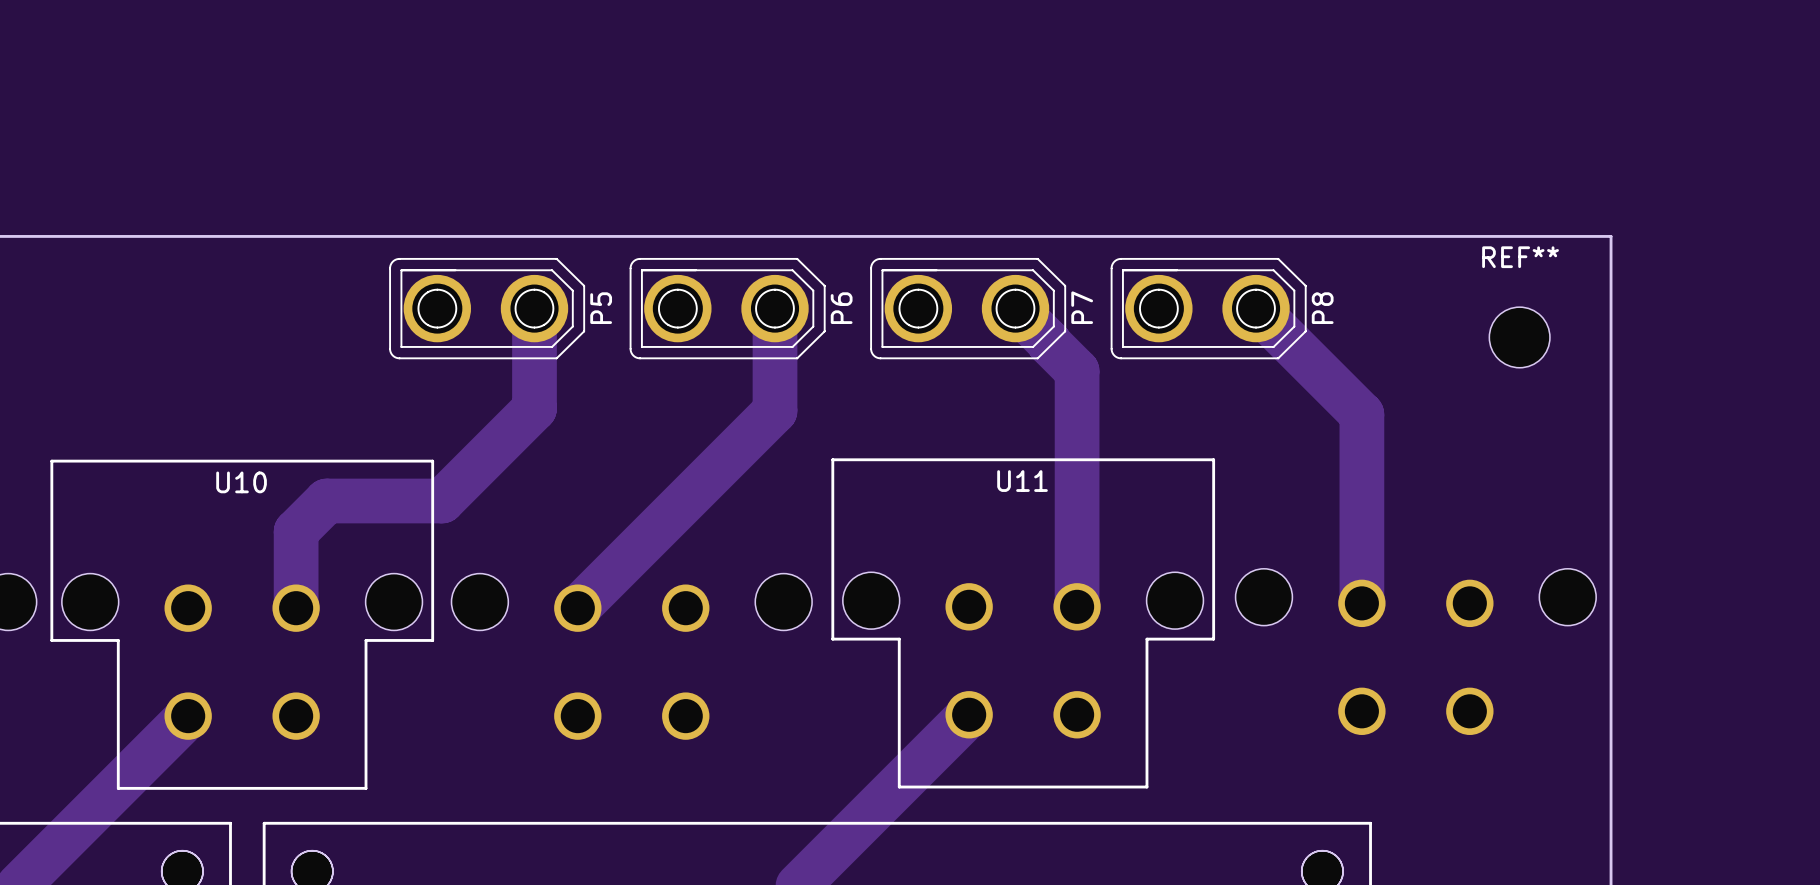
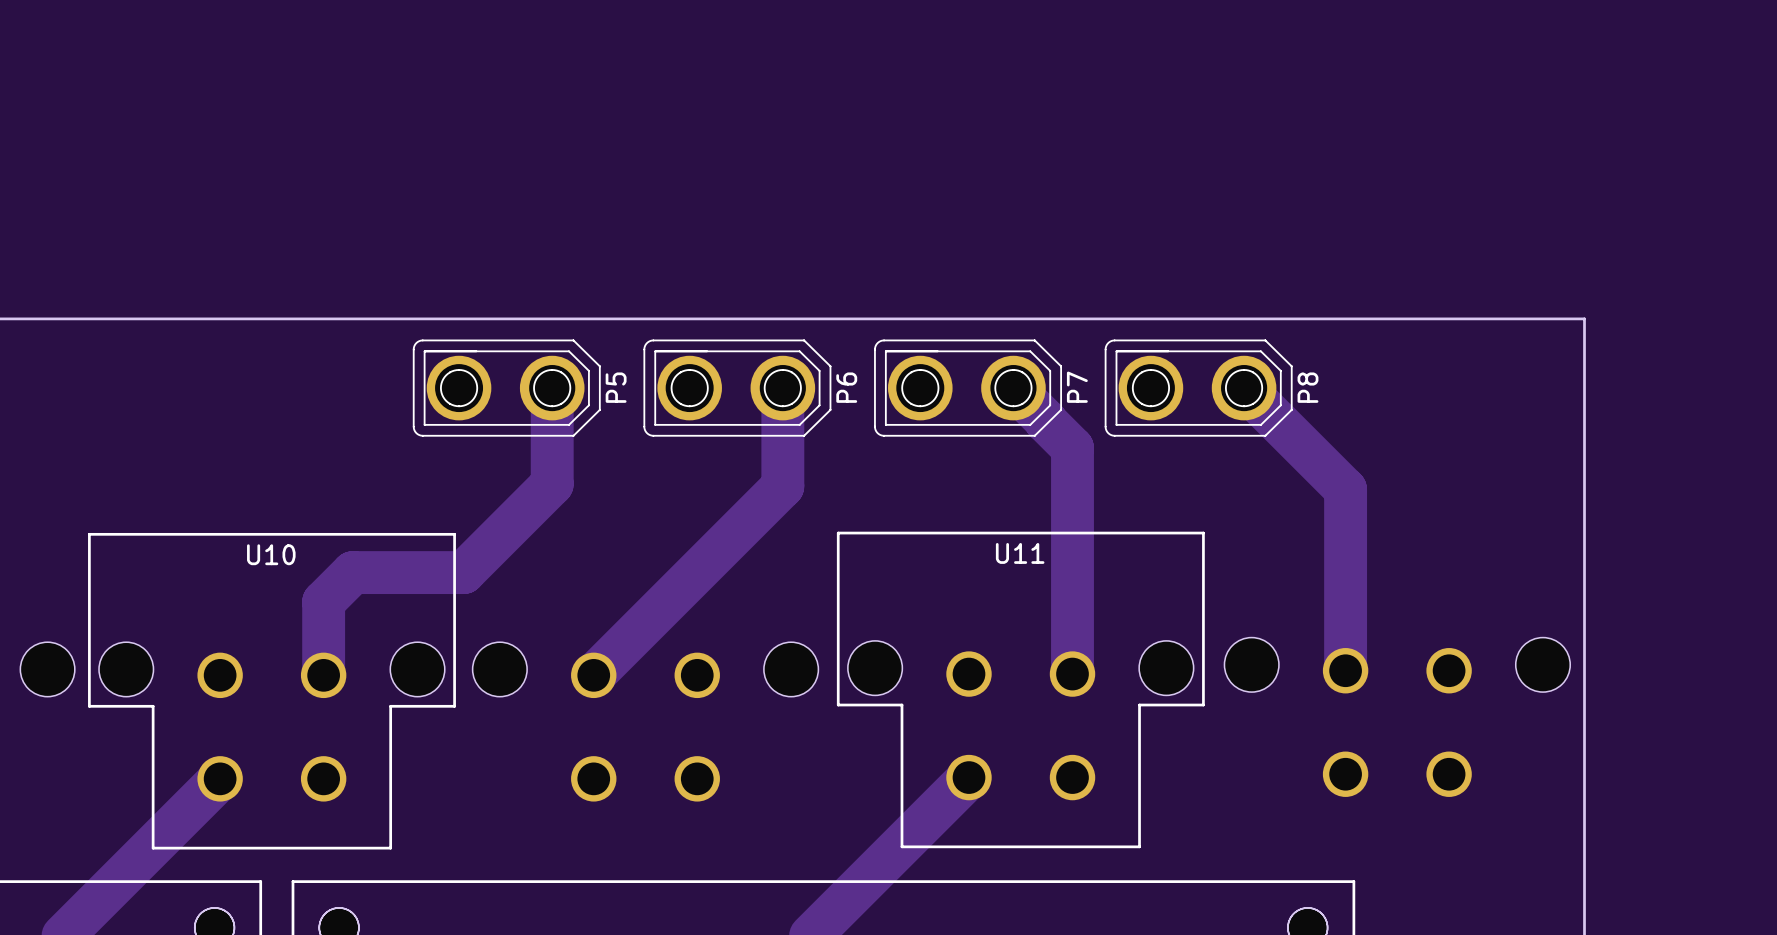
REF**: (1519, 337) -> none

